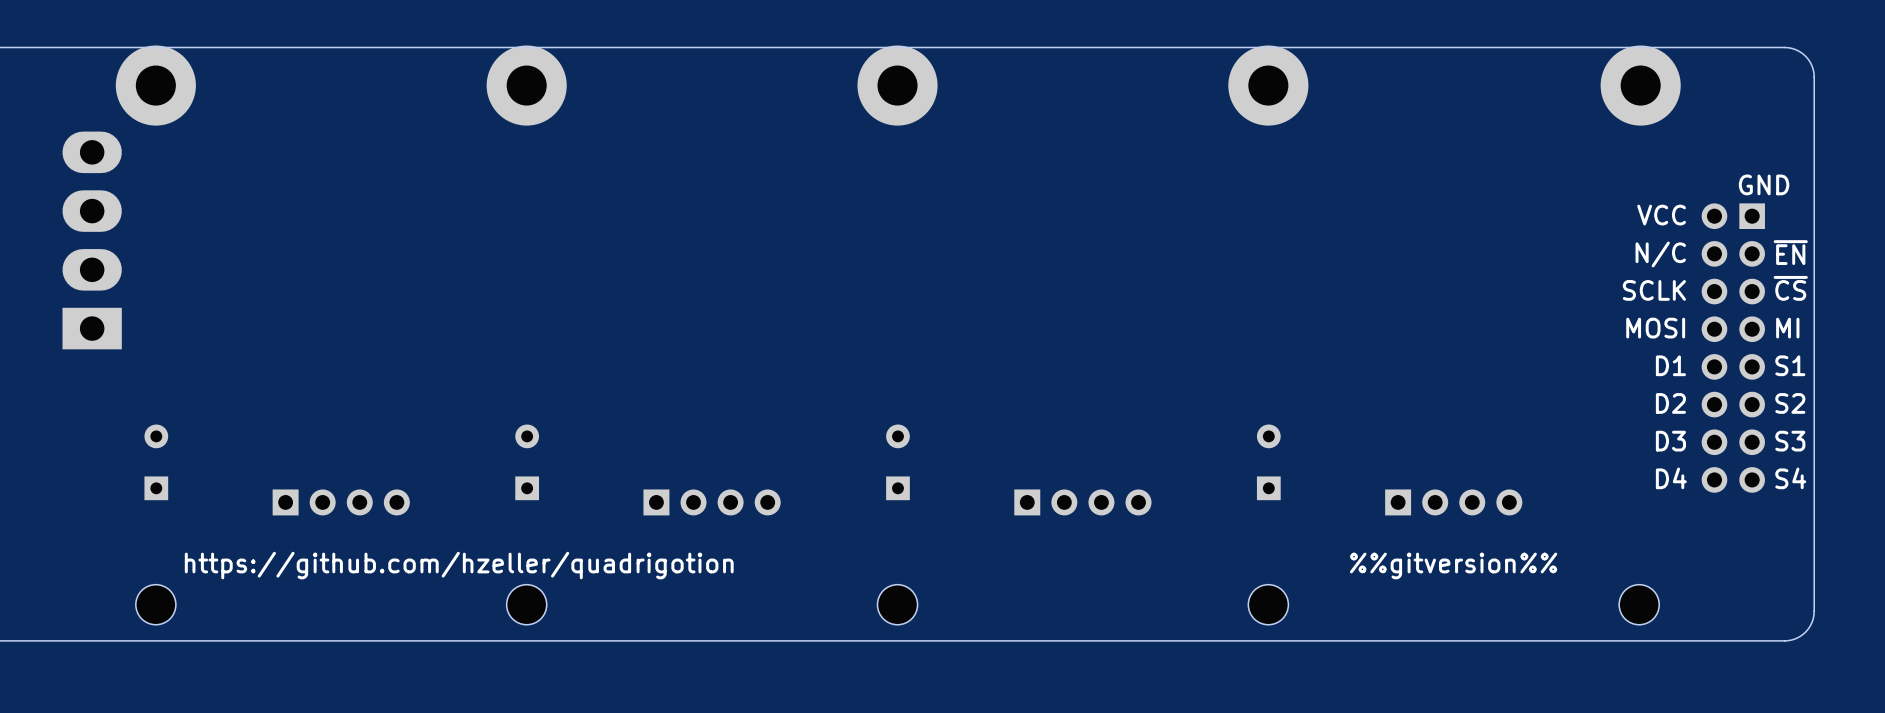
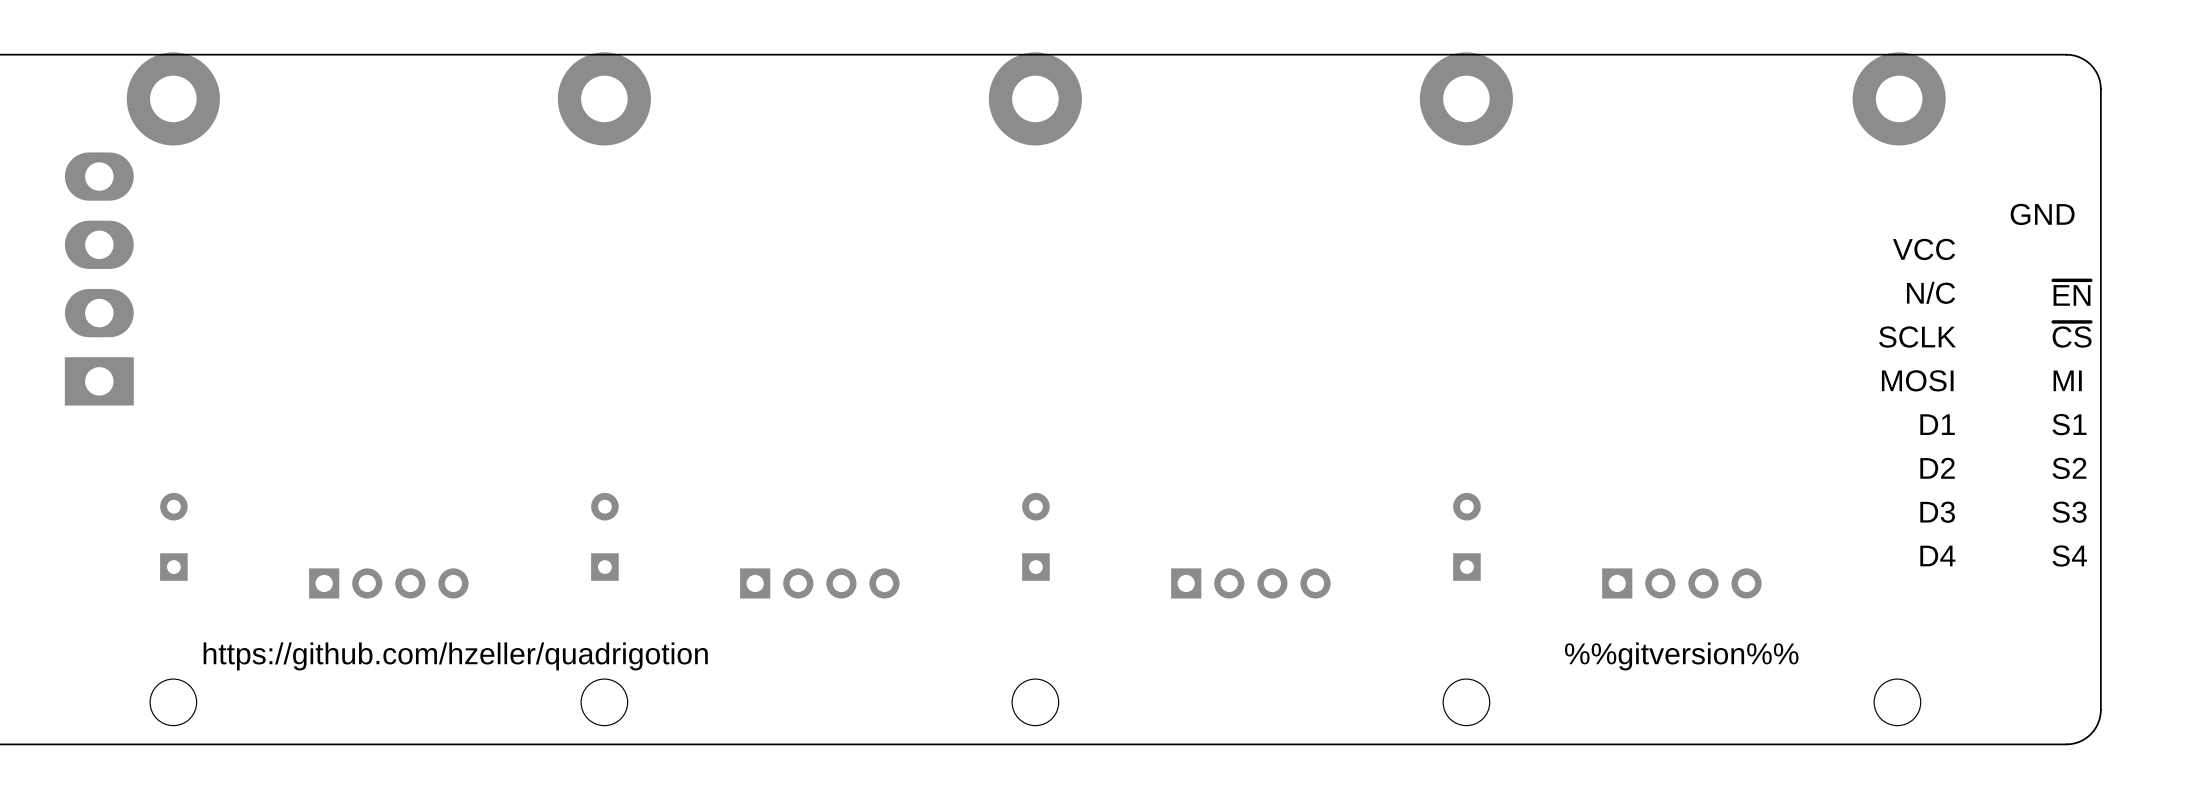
part: (1733, 348) -> none

